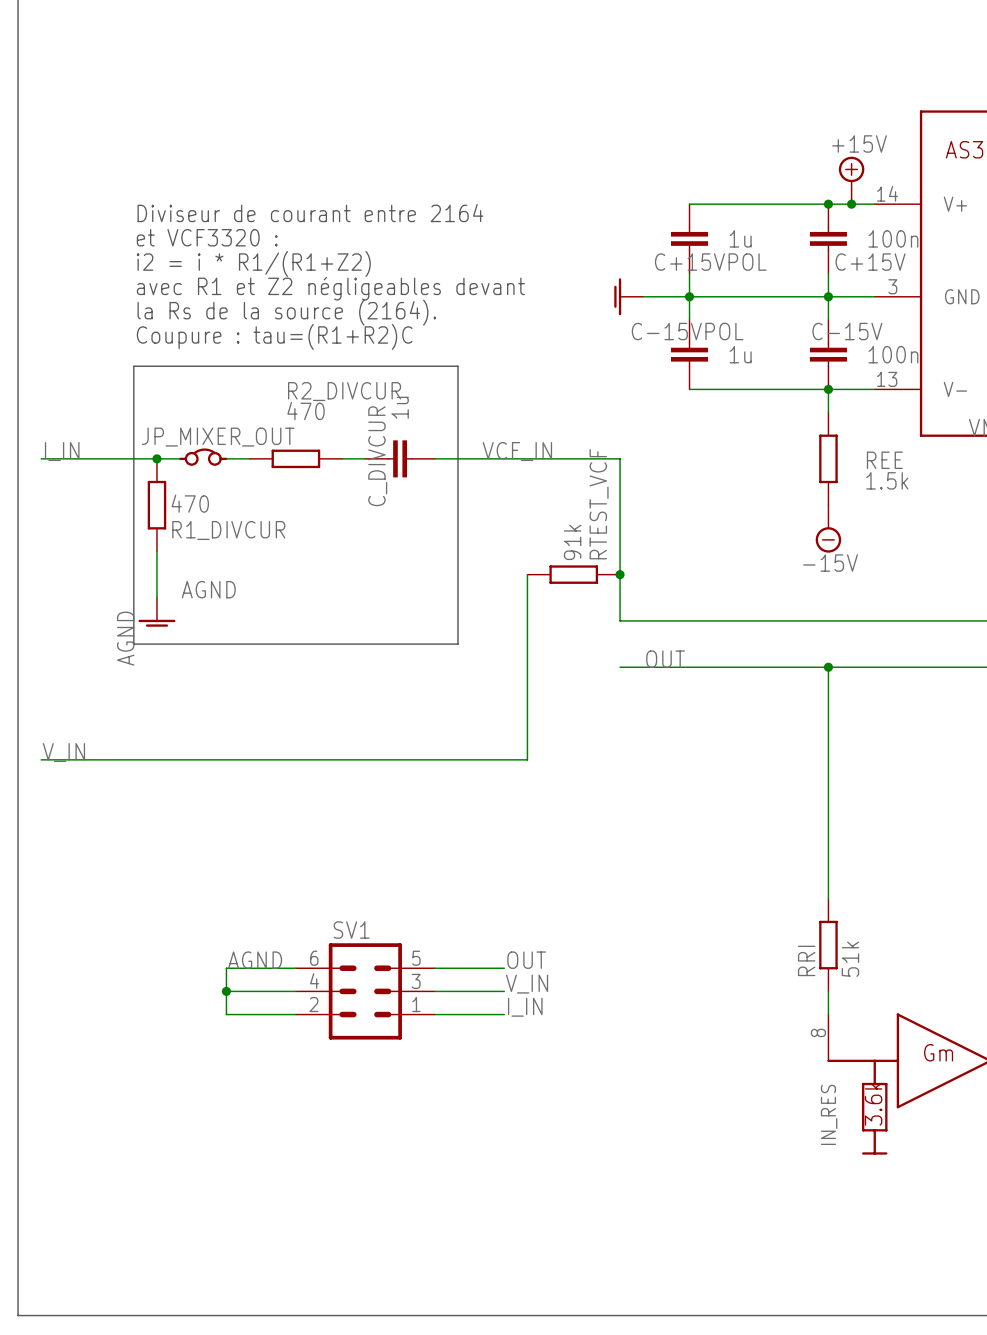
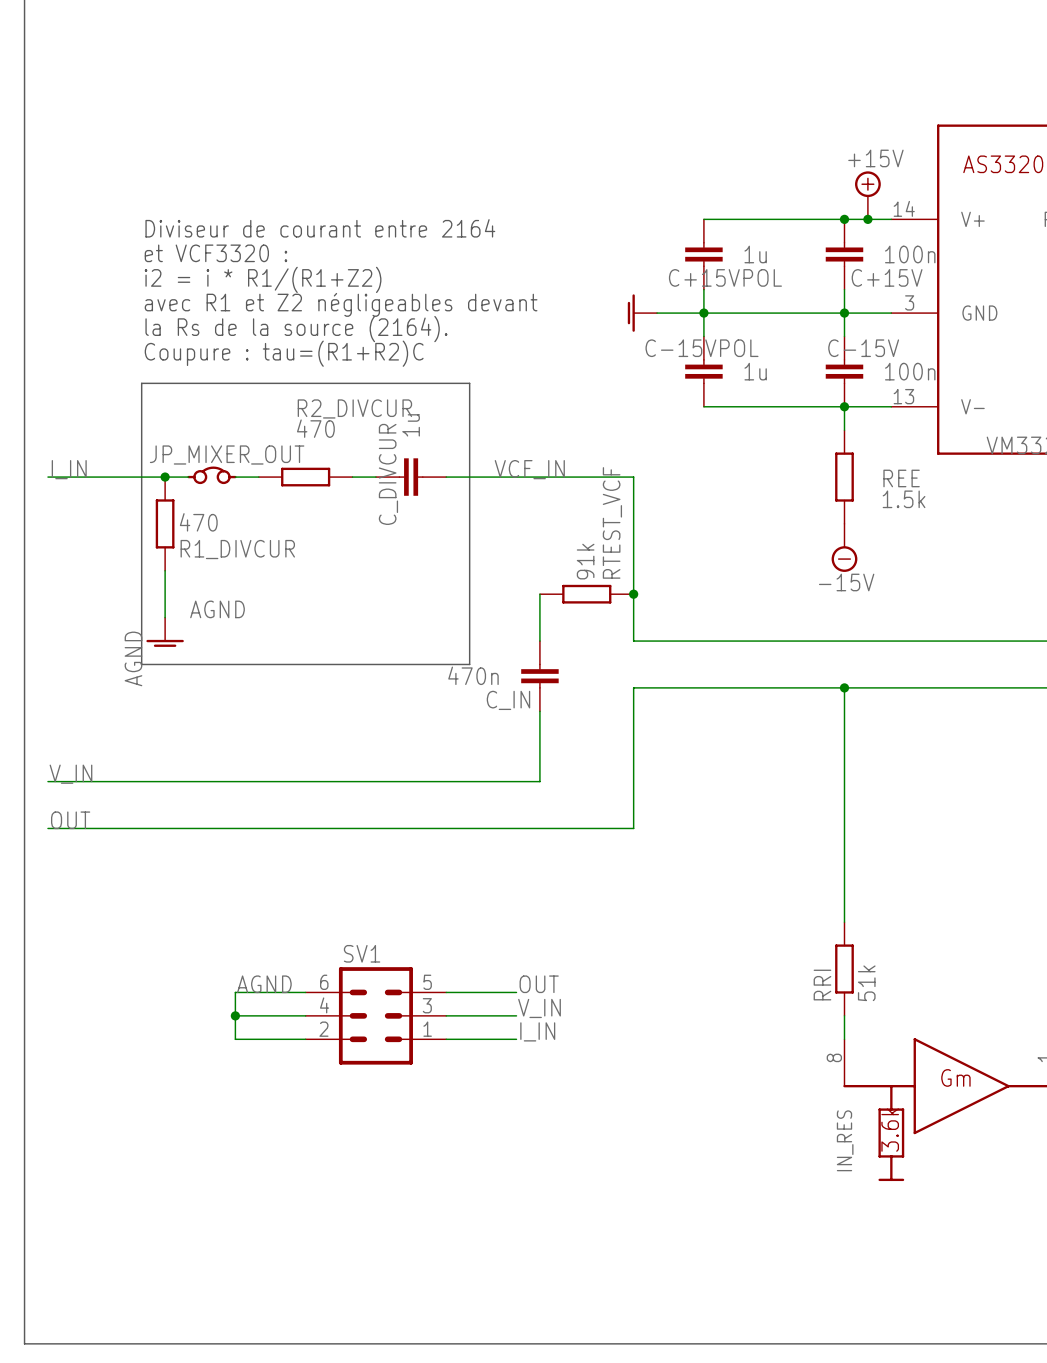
C_IN: none -> 470n (539, 676)
label: OUT (665, 659) -> none
wire: none -> (633, 687) (633, 828) (47, 828)
label: none -> OUT (70, 820)

